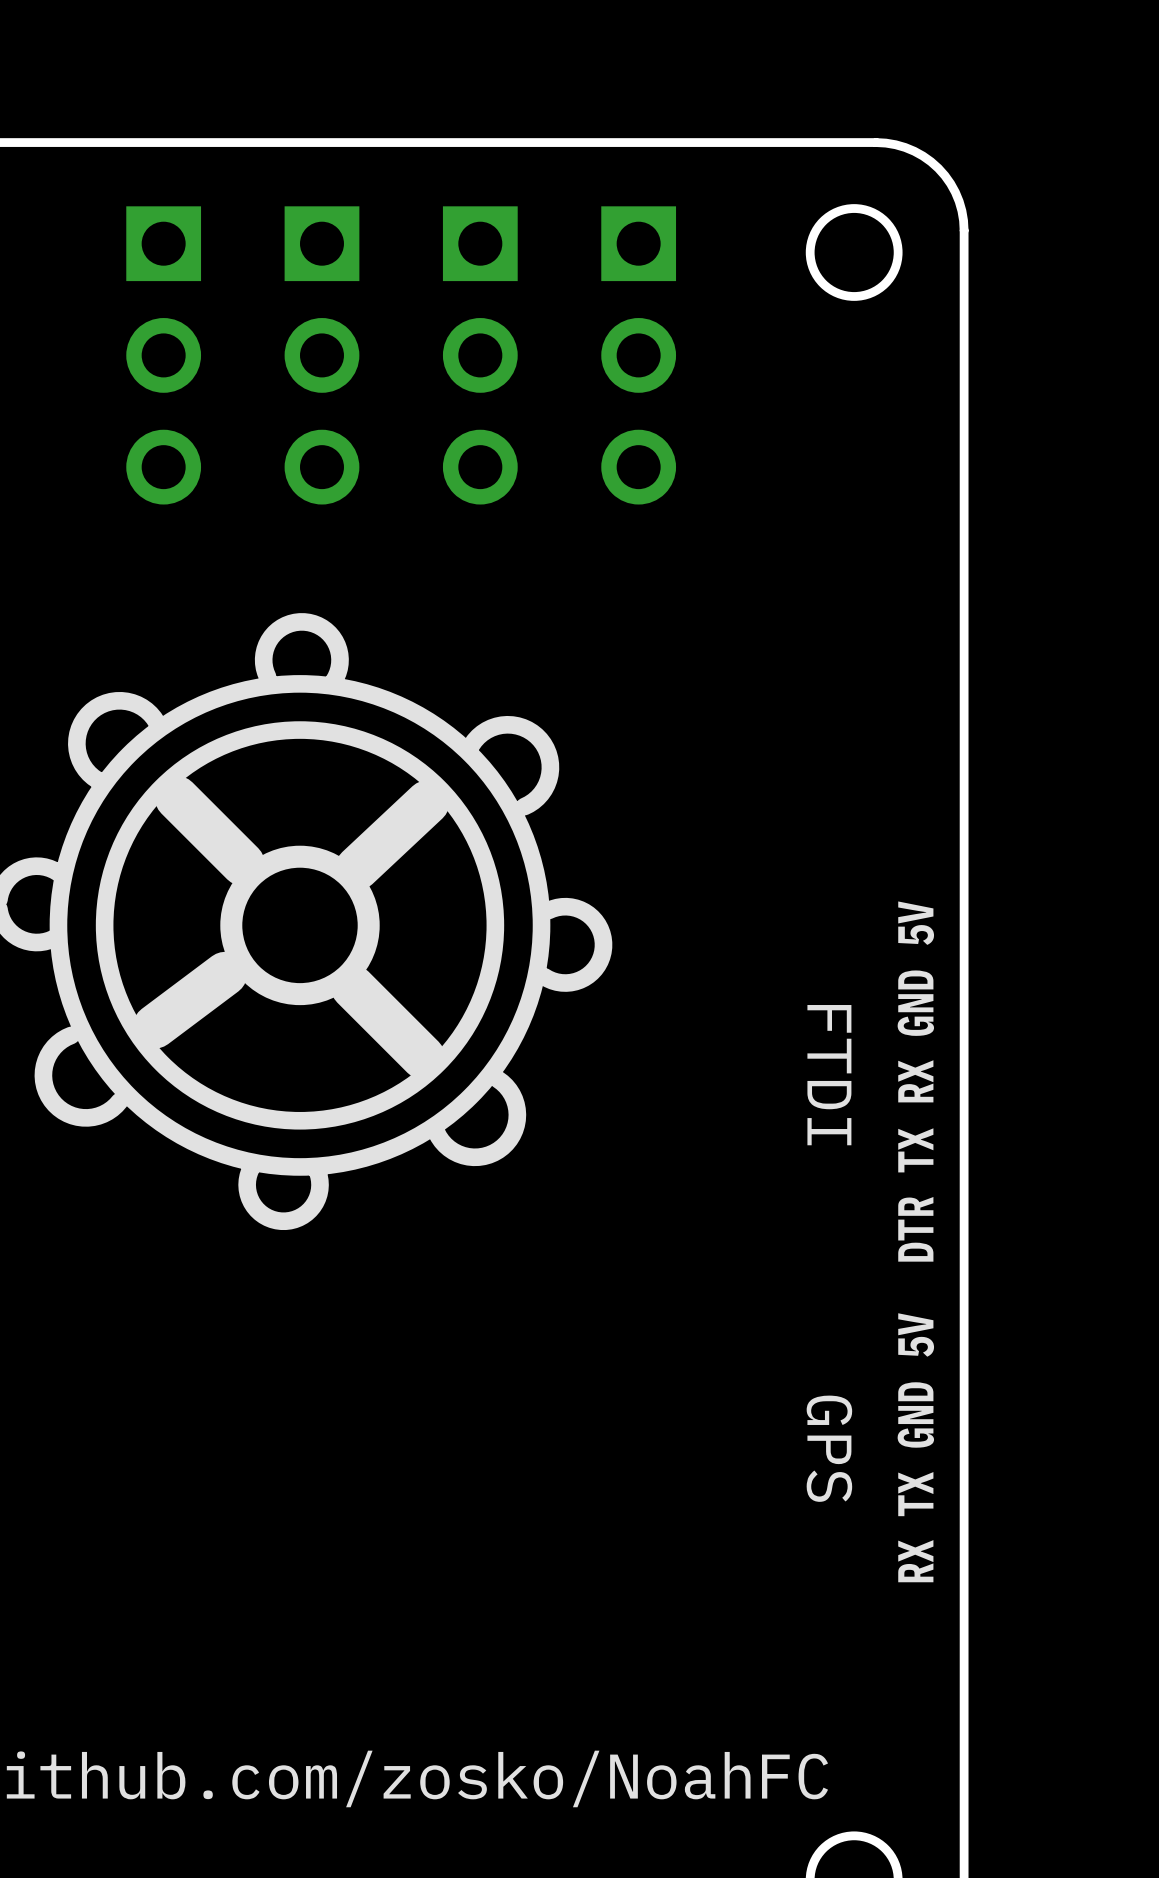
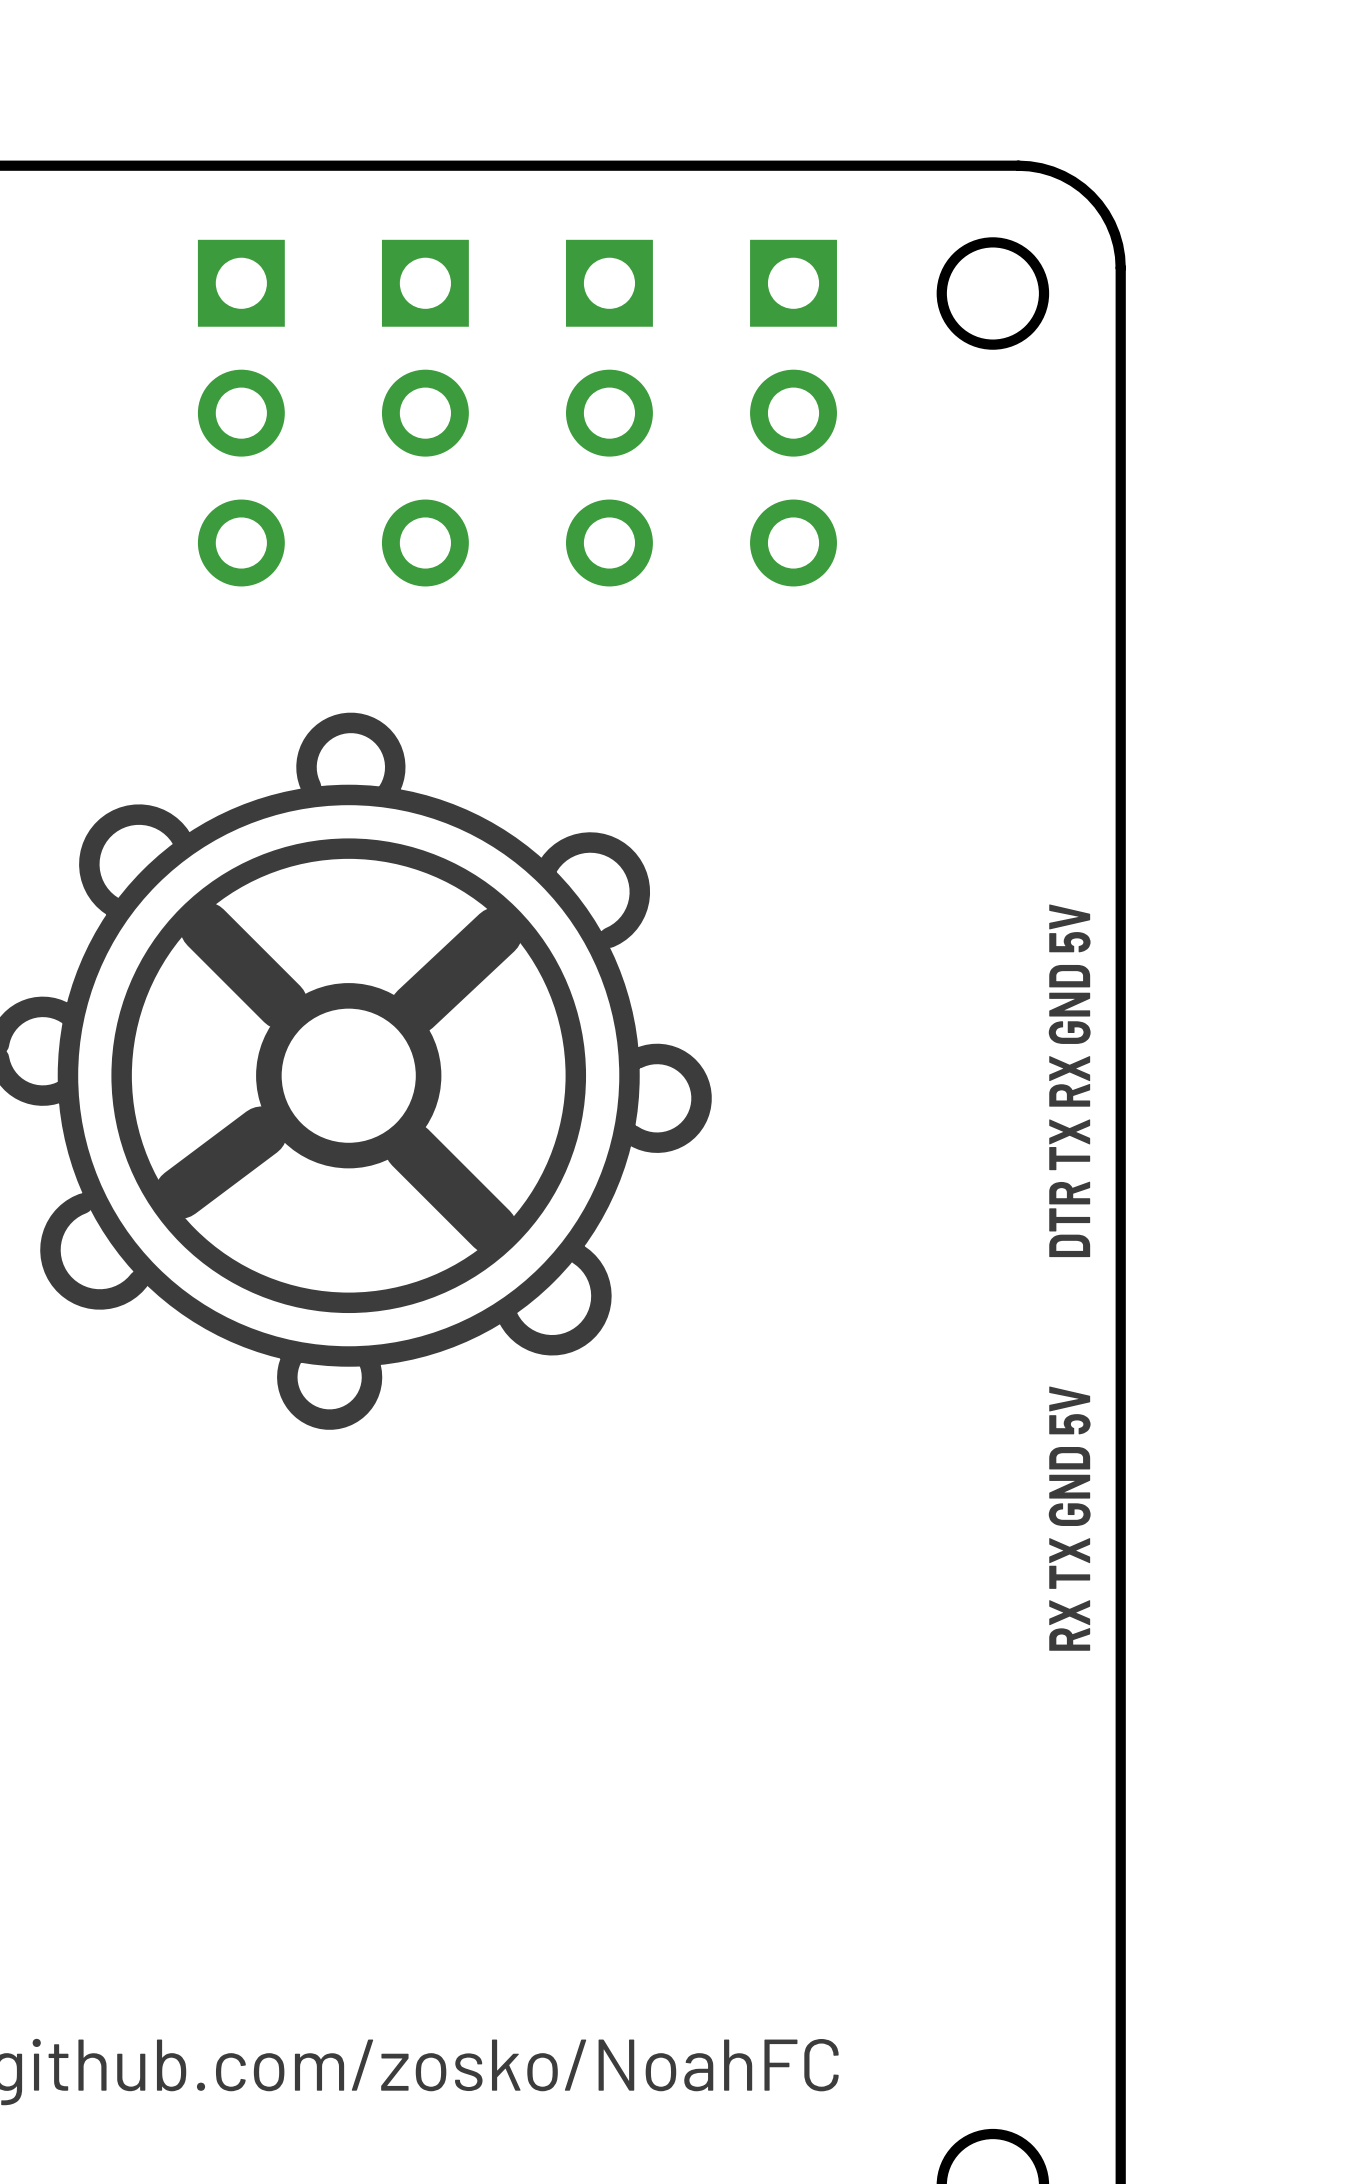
part position: (163, 355) -> (241, 413)
part position: (321, 355) -> (425, 413)
part position: (480, 355) -> (609, 413)
part position: (638, 355) -> (793, 413)
part: FTDI (829, 1075) -> none
text position: DTR TX RX GND 5V (915, 1081) -> DTR TX RX GND 5V (1069, 1080)
text position: RX TX GND 5V (915, 1447) -> RX TX GND 5V (1069, 1518)
part: GPS (829, 1448) -> none

